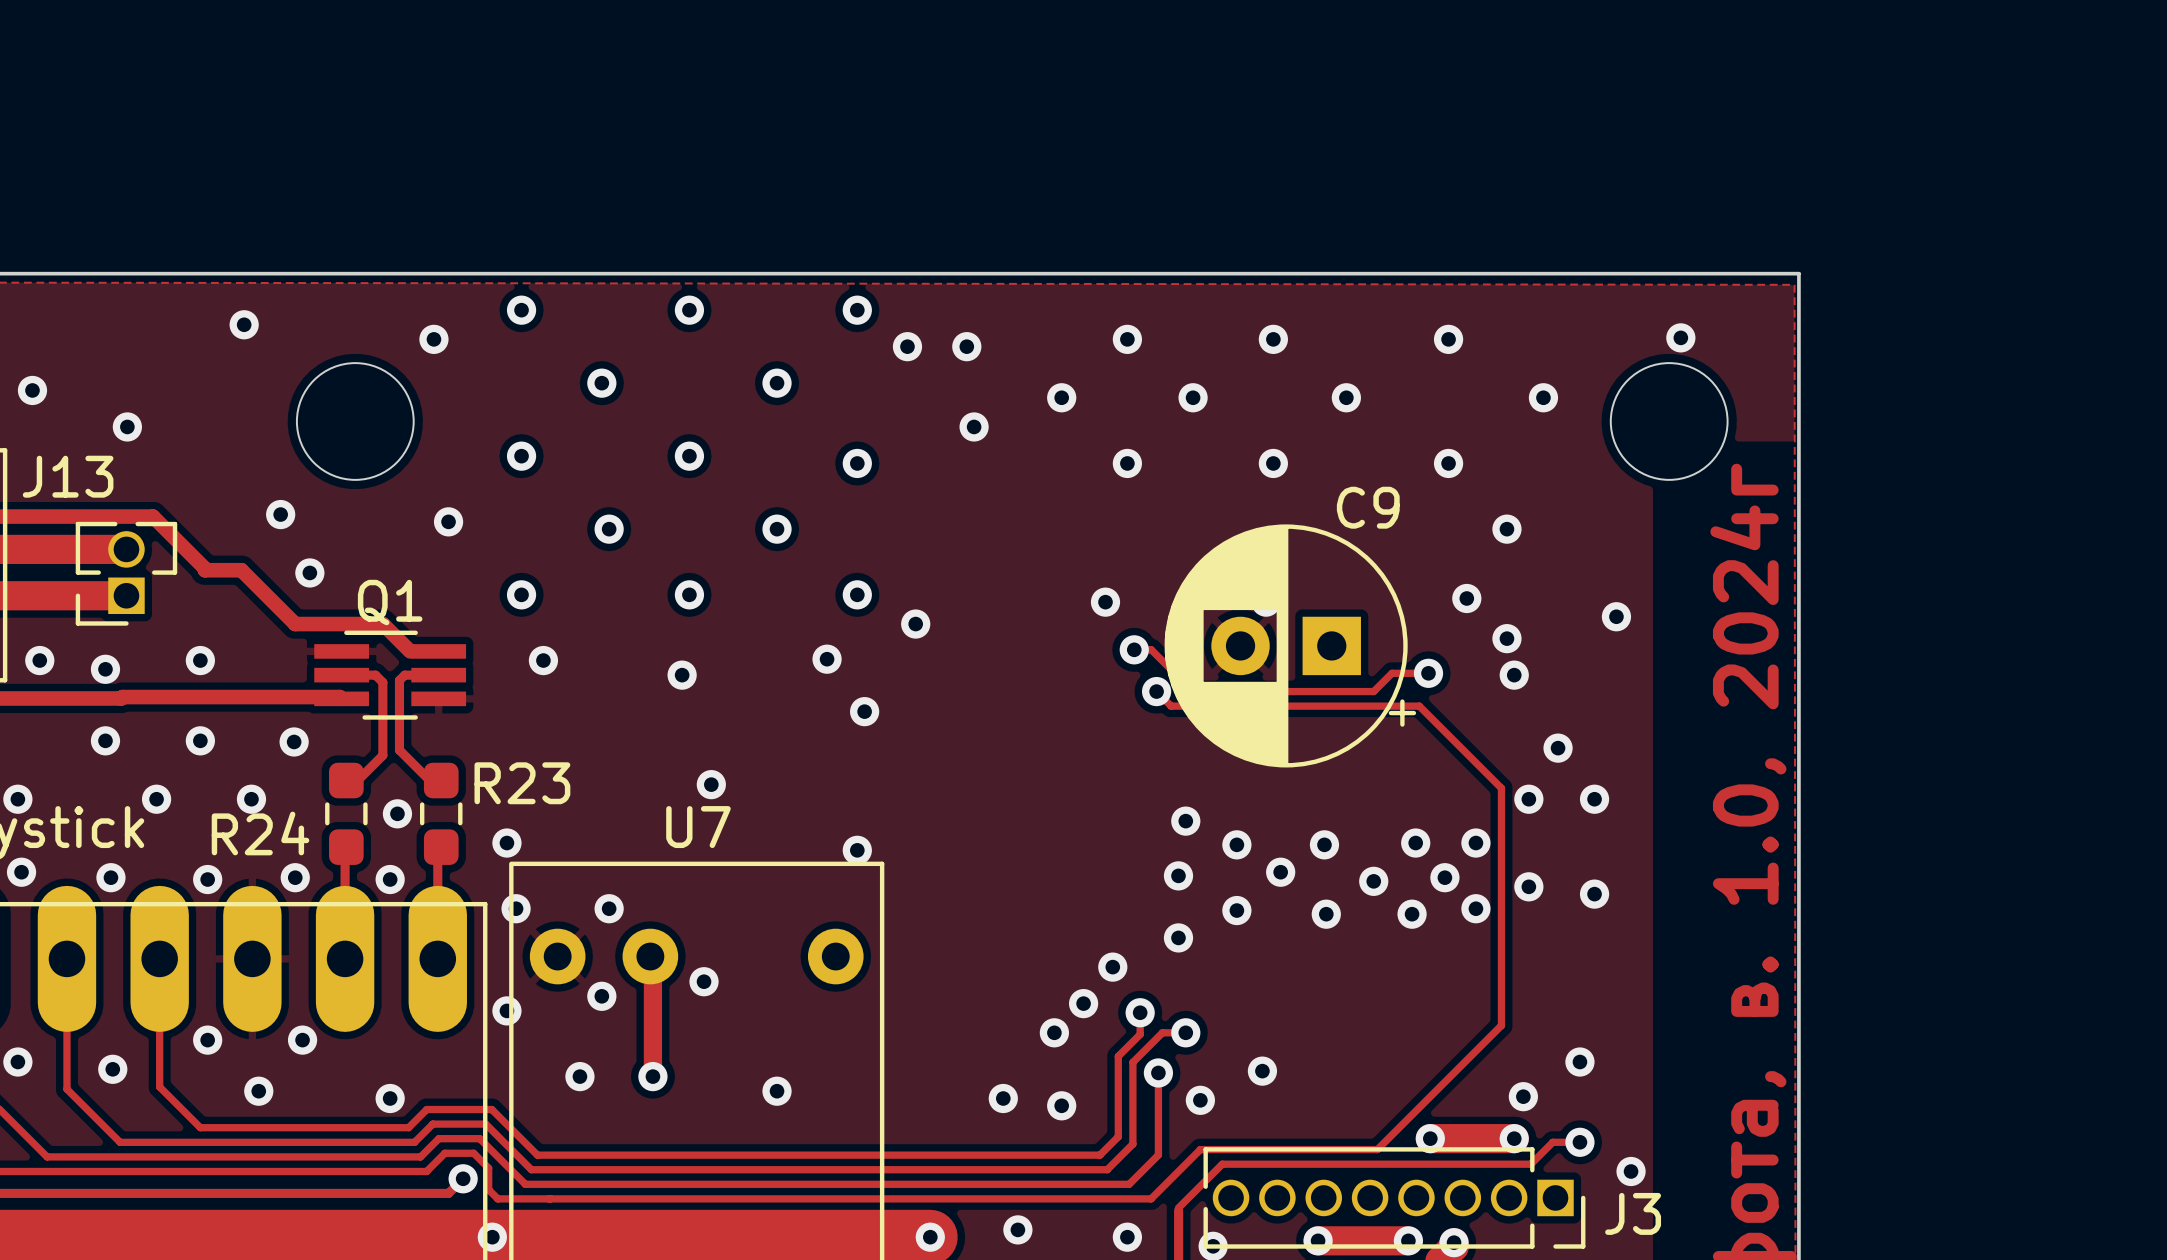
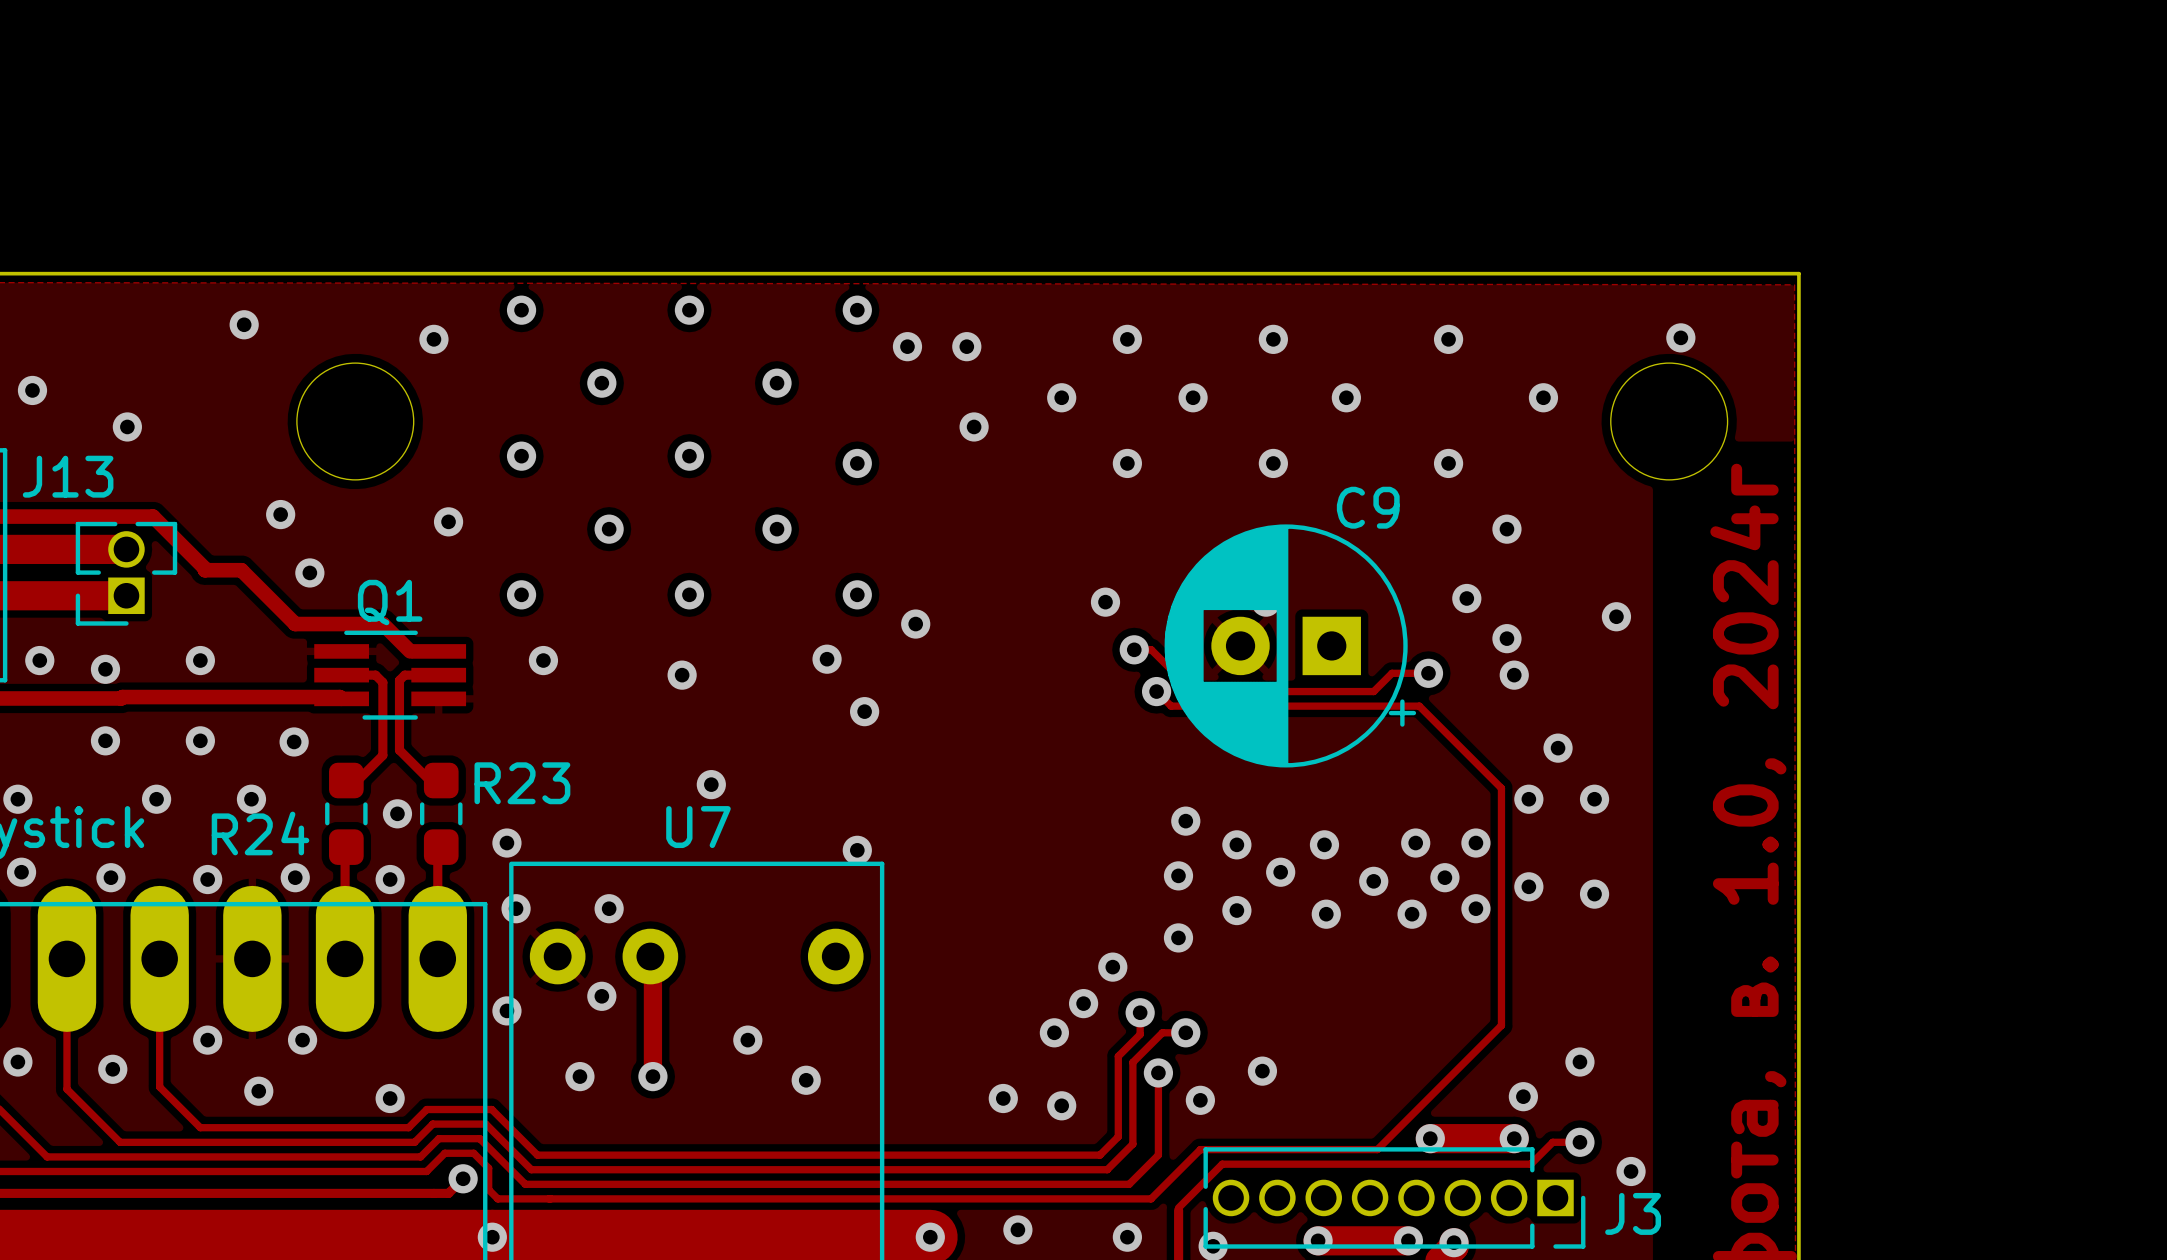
via: (704, 981) -> none
via: none -> (747, 1040)
via position: (777, 1091) -> (806, 1080)

